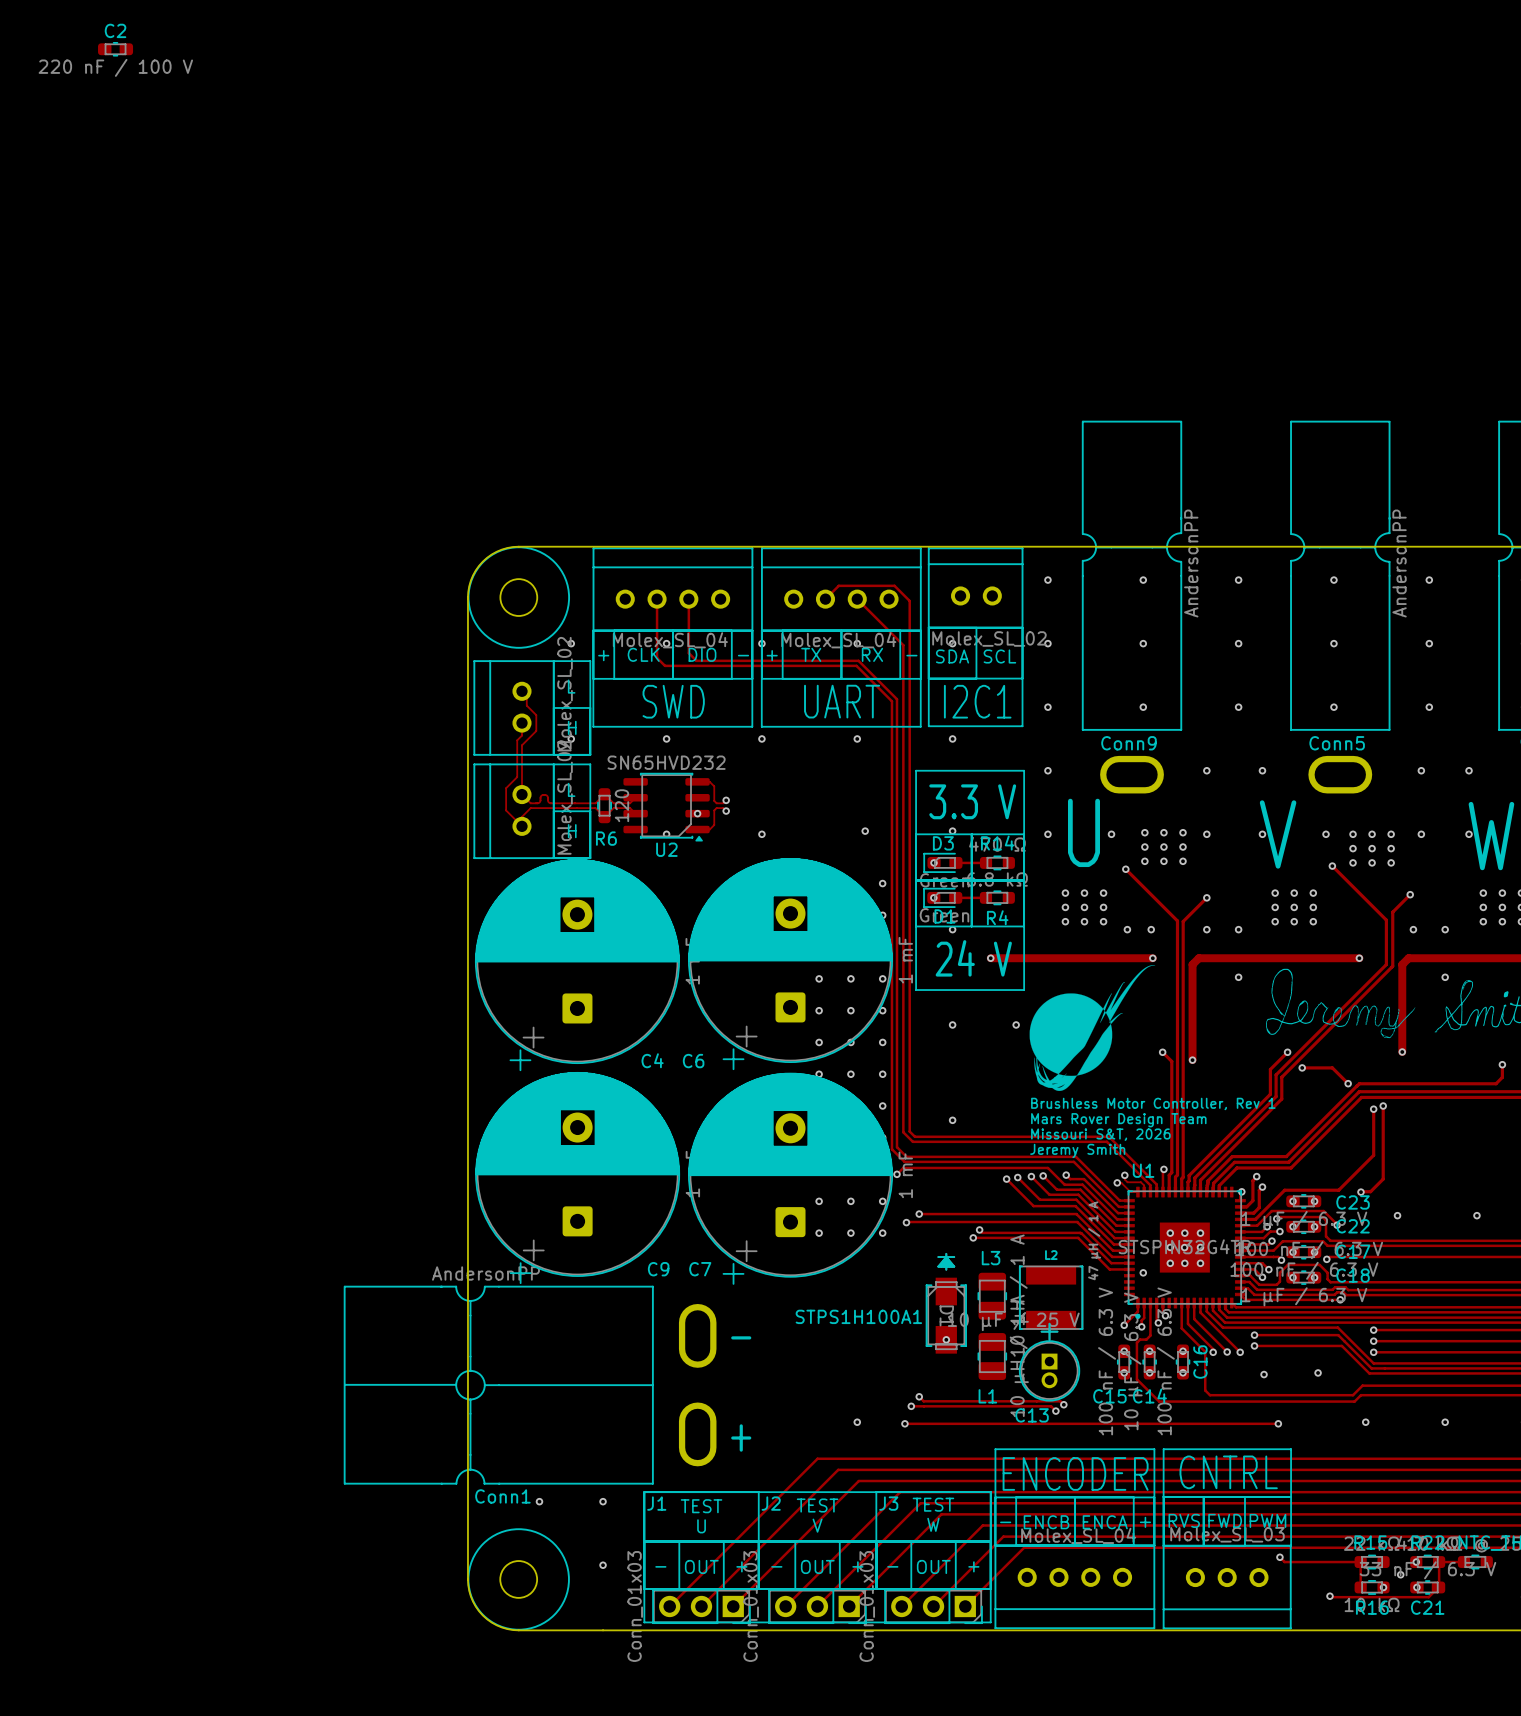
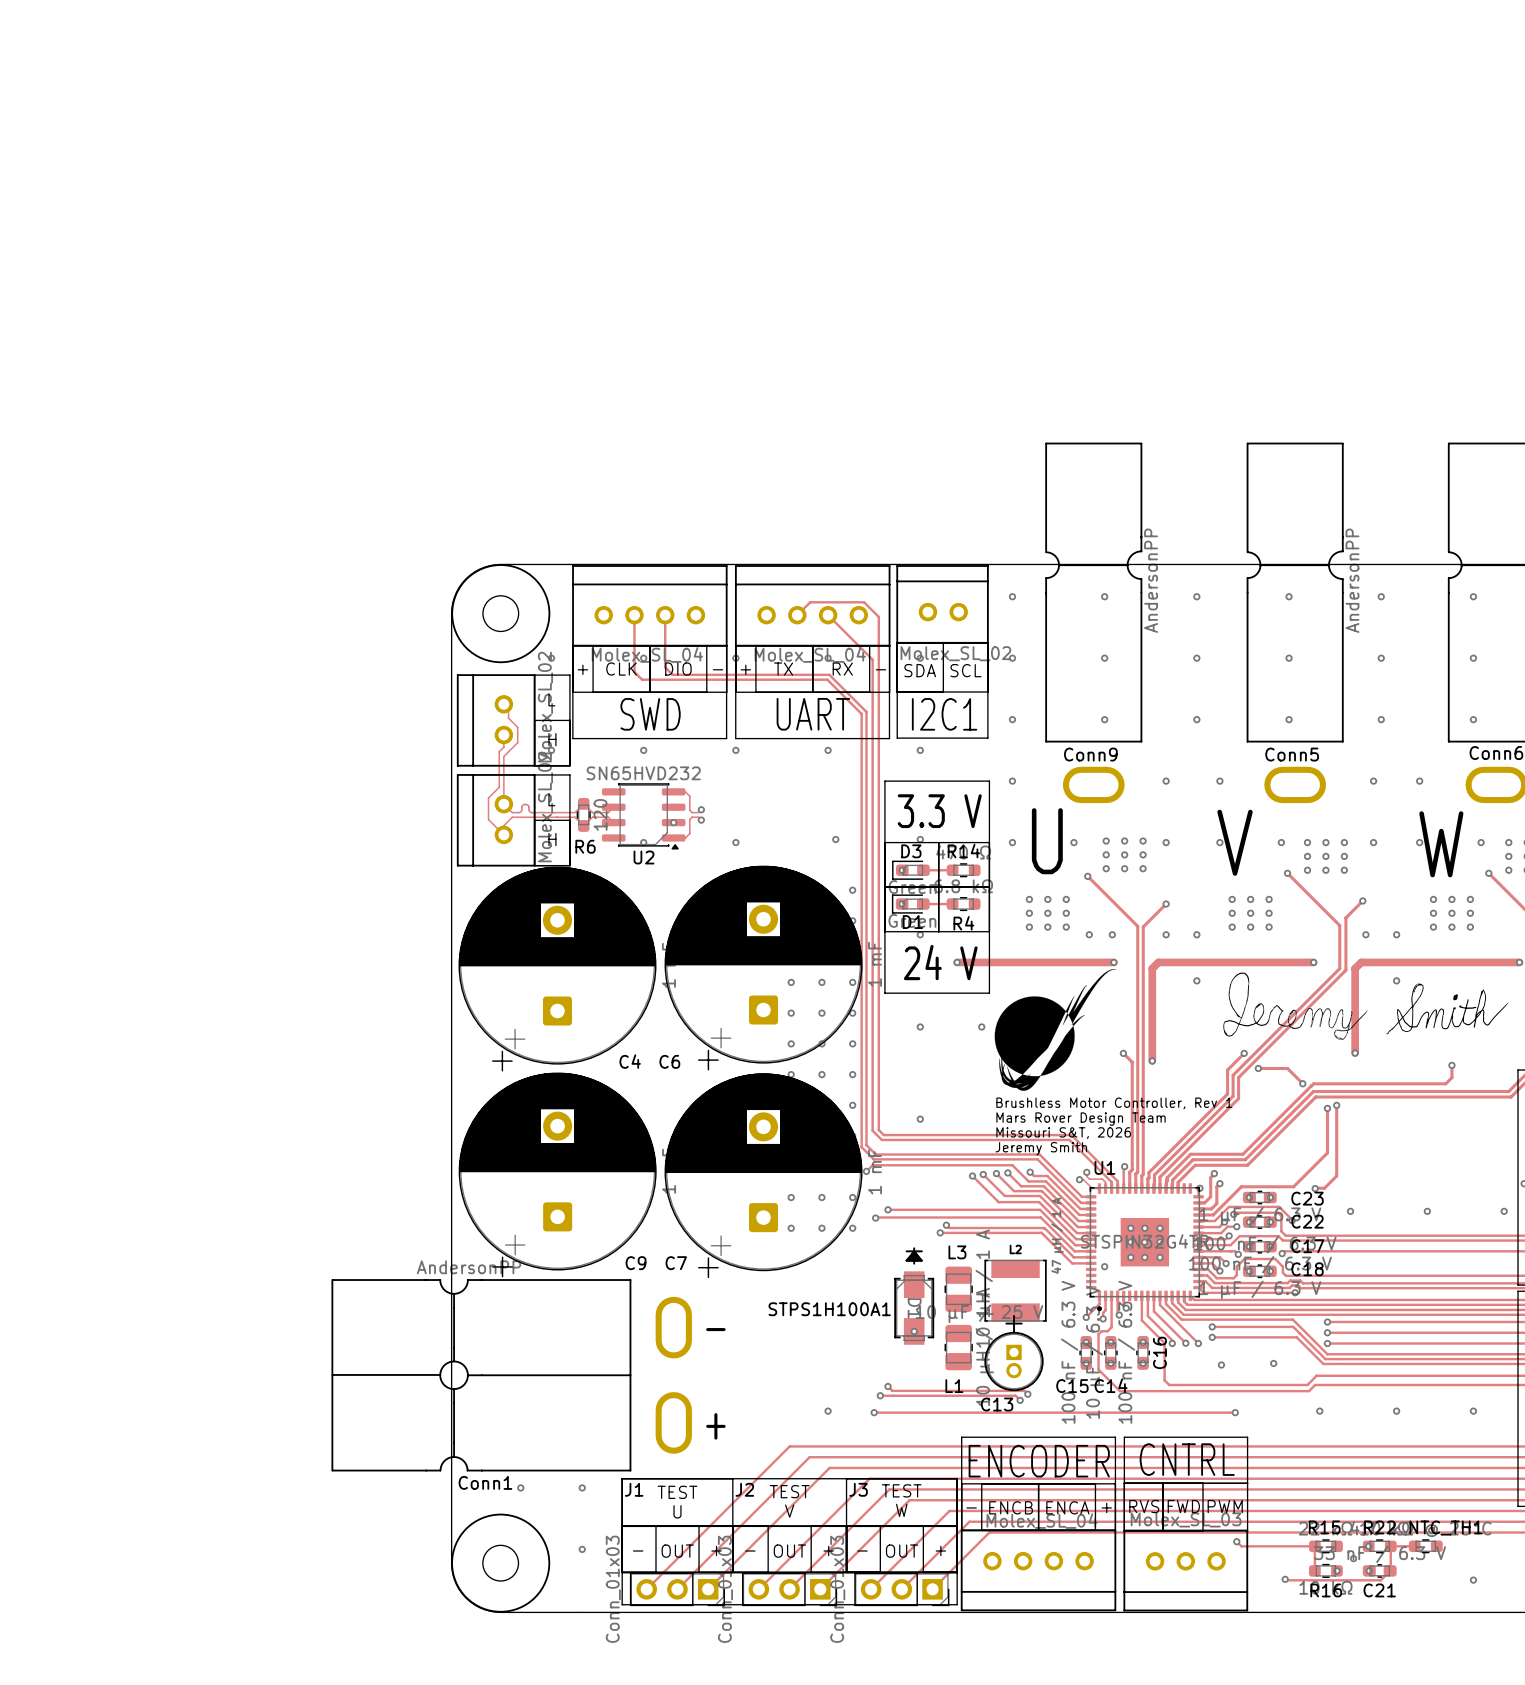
C2: 220 nF / 100 V (115, 49) -> none

